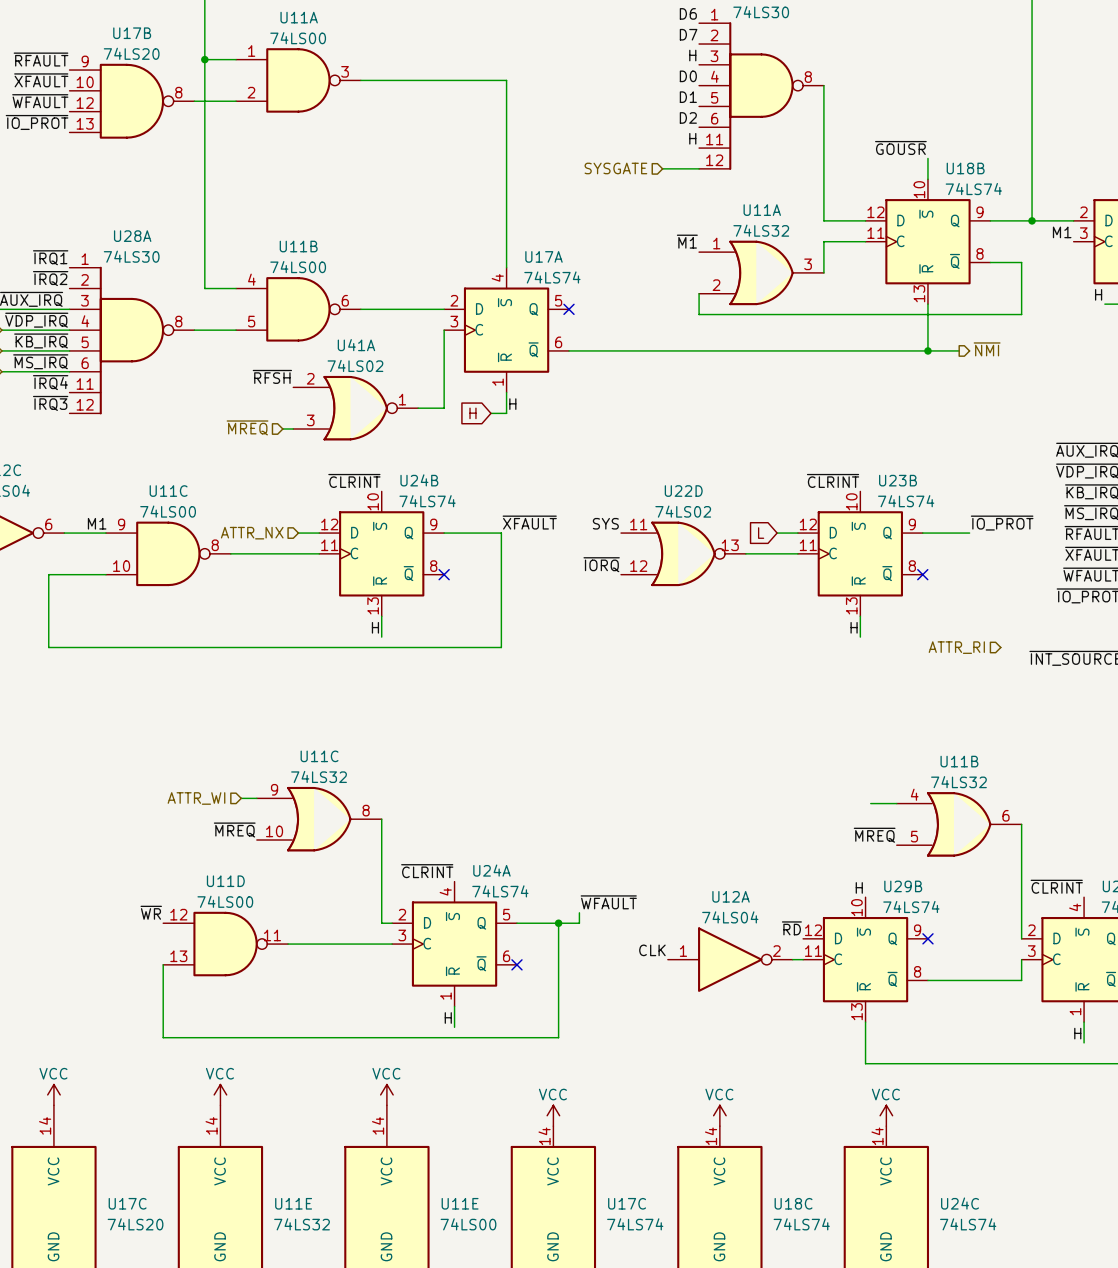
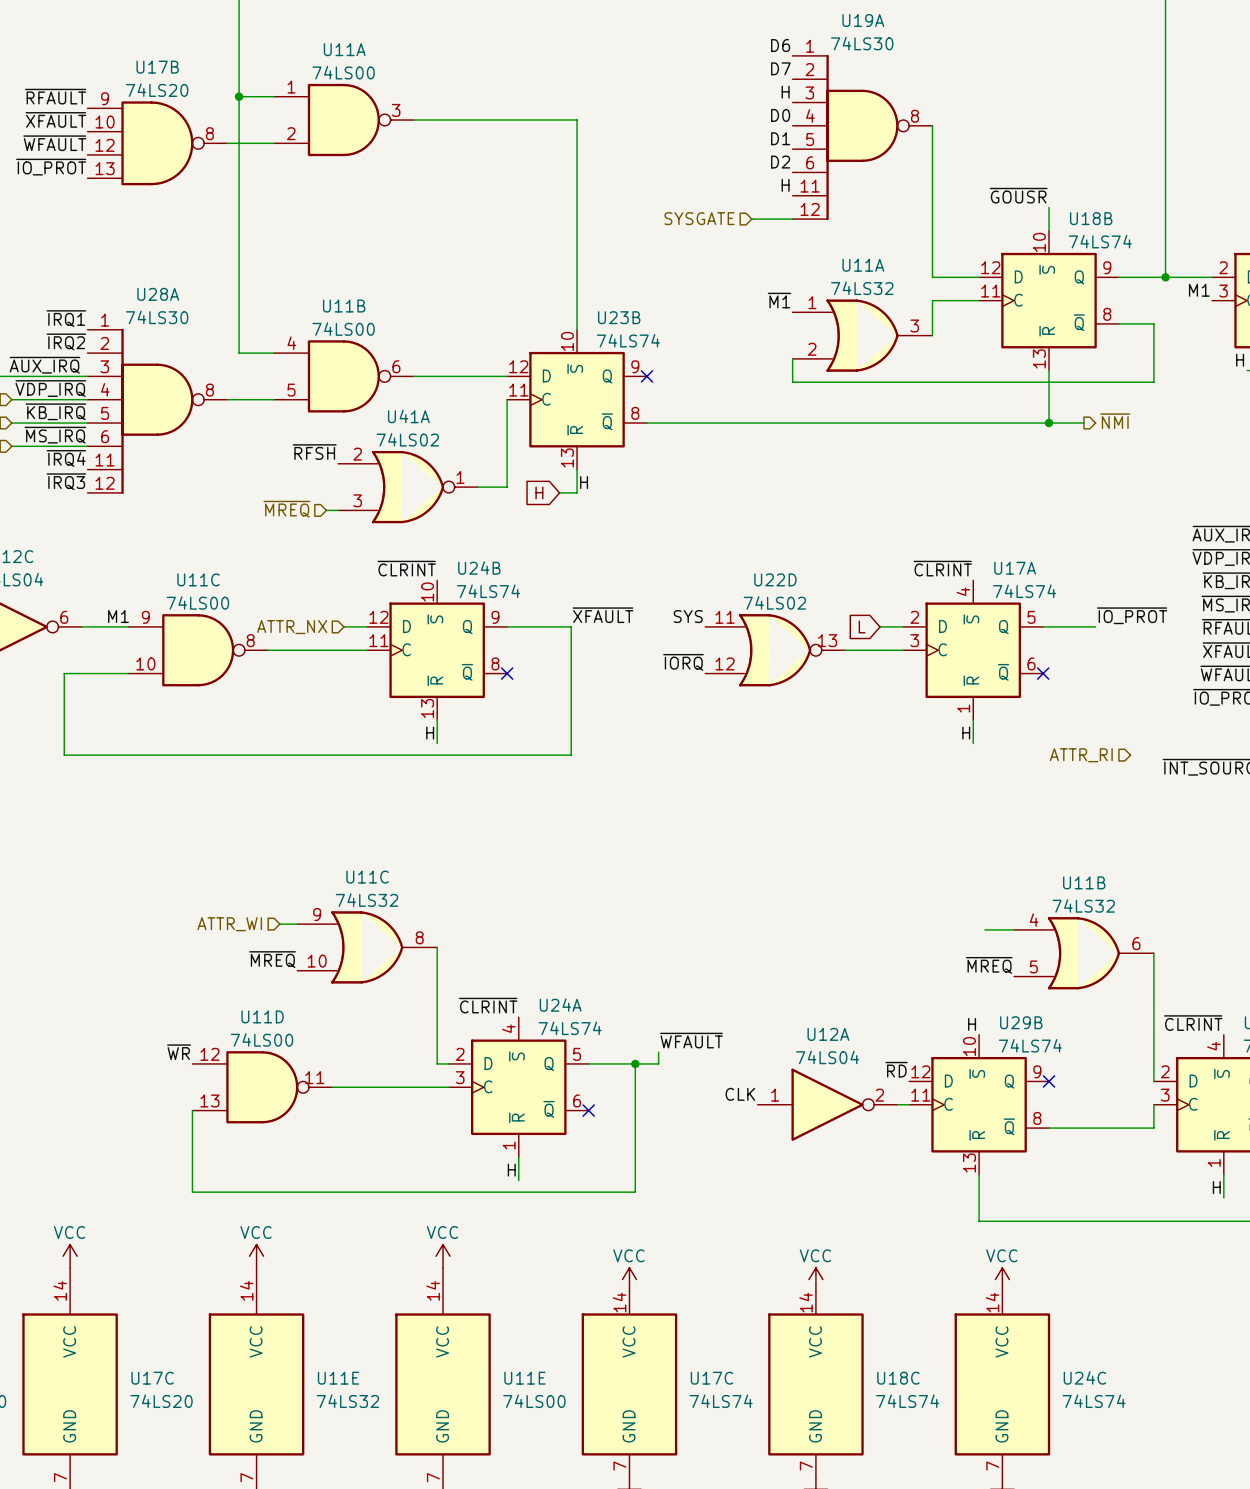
U17A position: (506, 330) -> (973, 650)
U23B position: (860, 553) -> (577, 399)

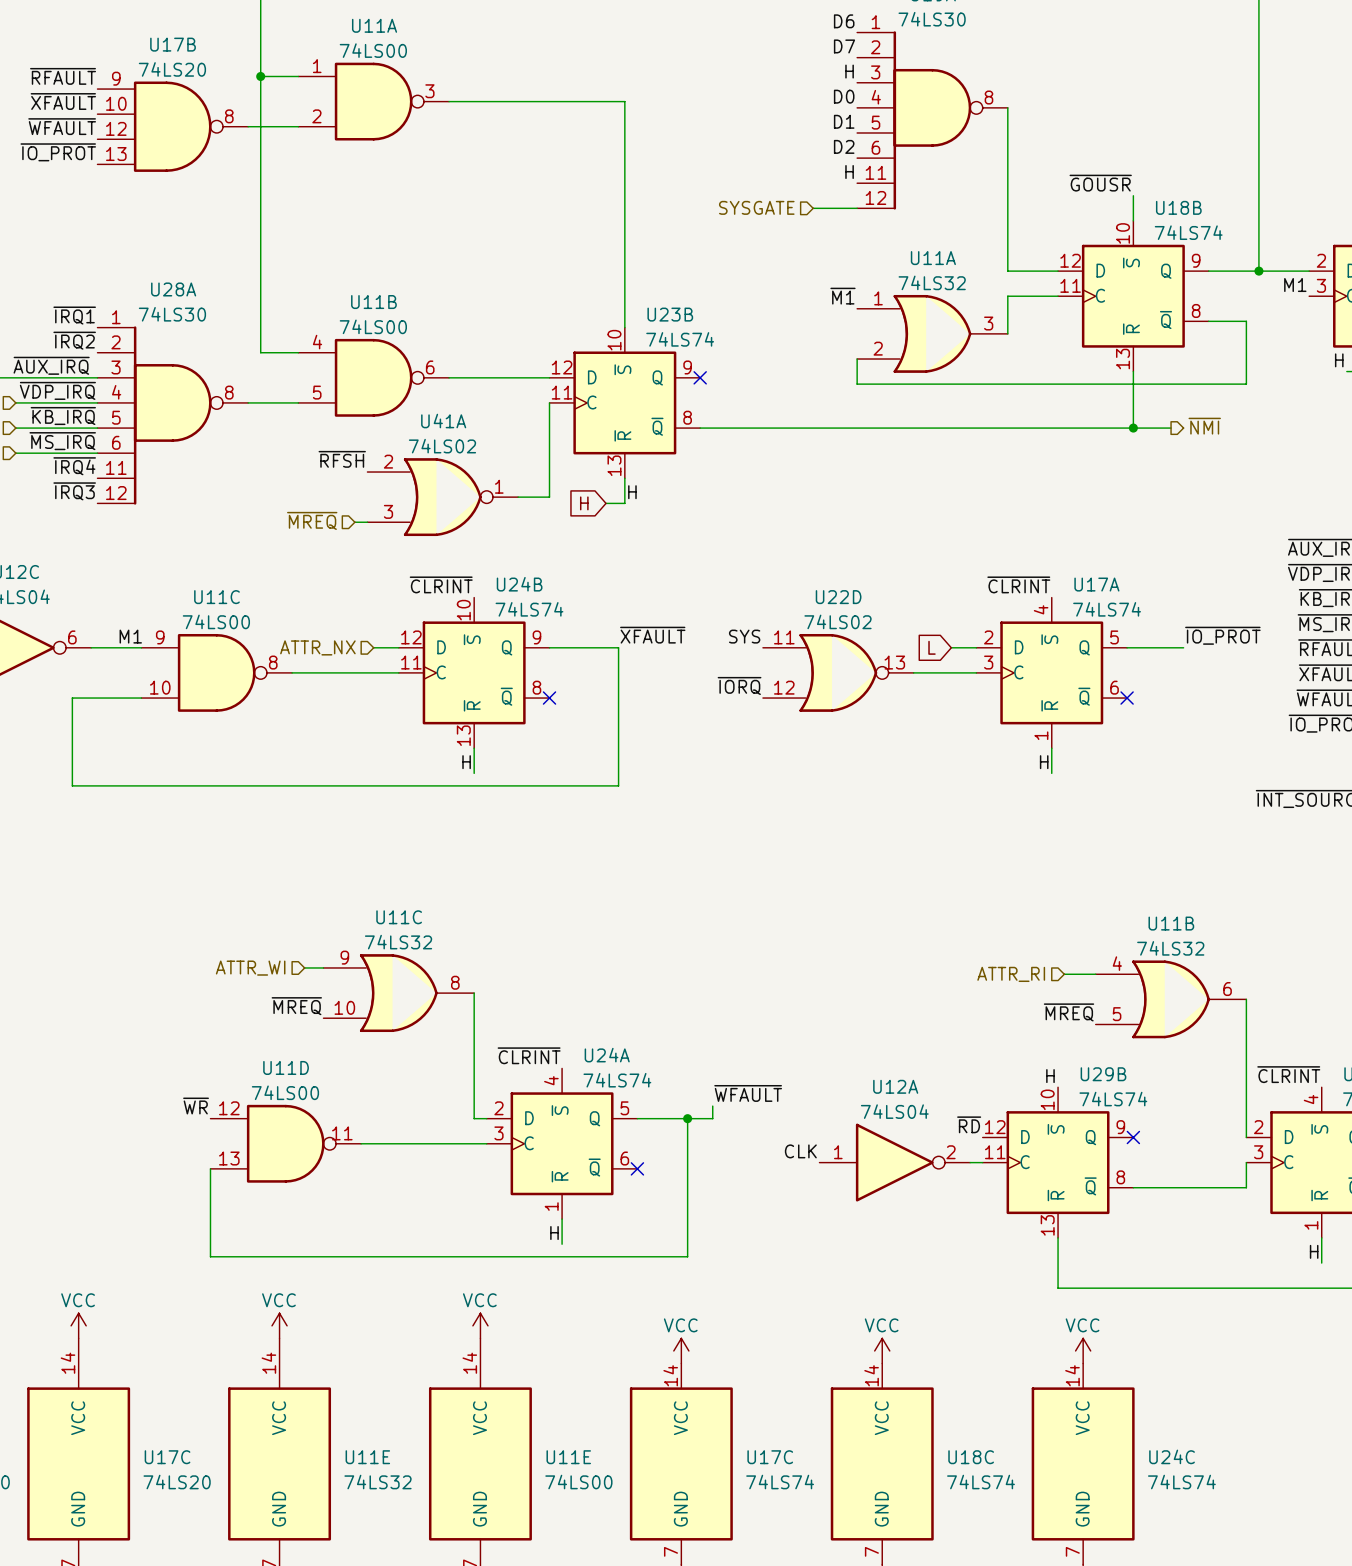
hierarchical label position: ATTR_RI (1081, 755) -> ATTR_RI (1011, 974)

